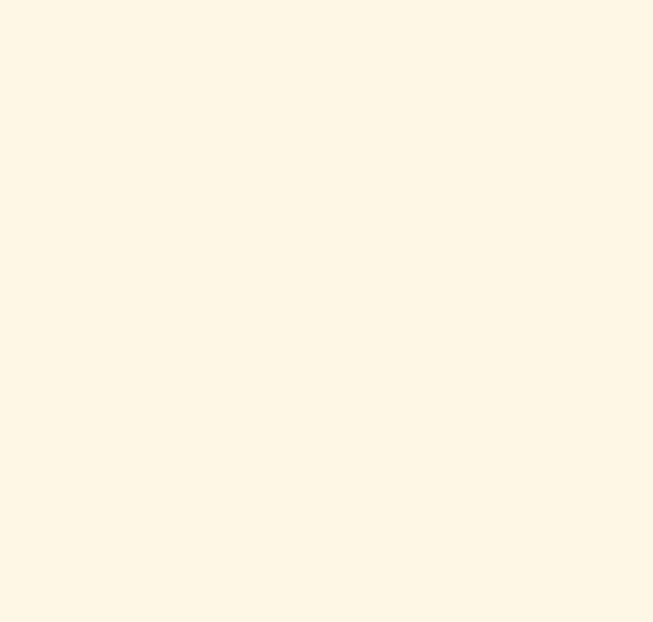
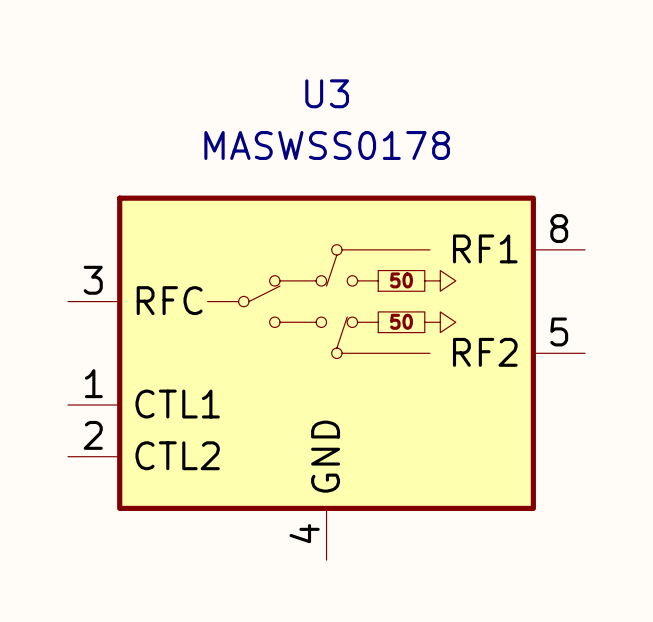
U3: none -> MASWSS0178 (326, 377)

